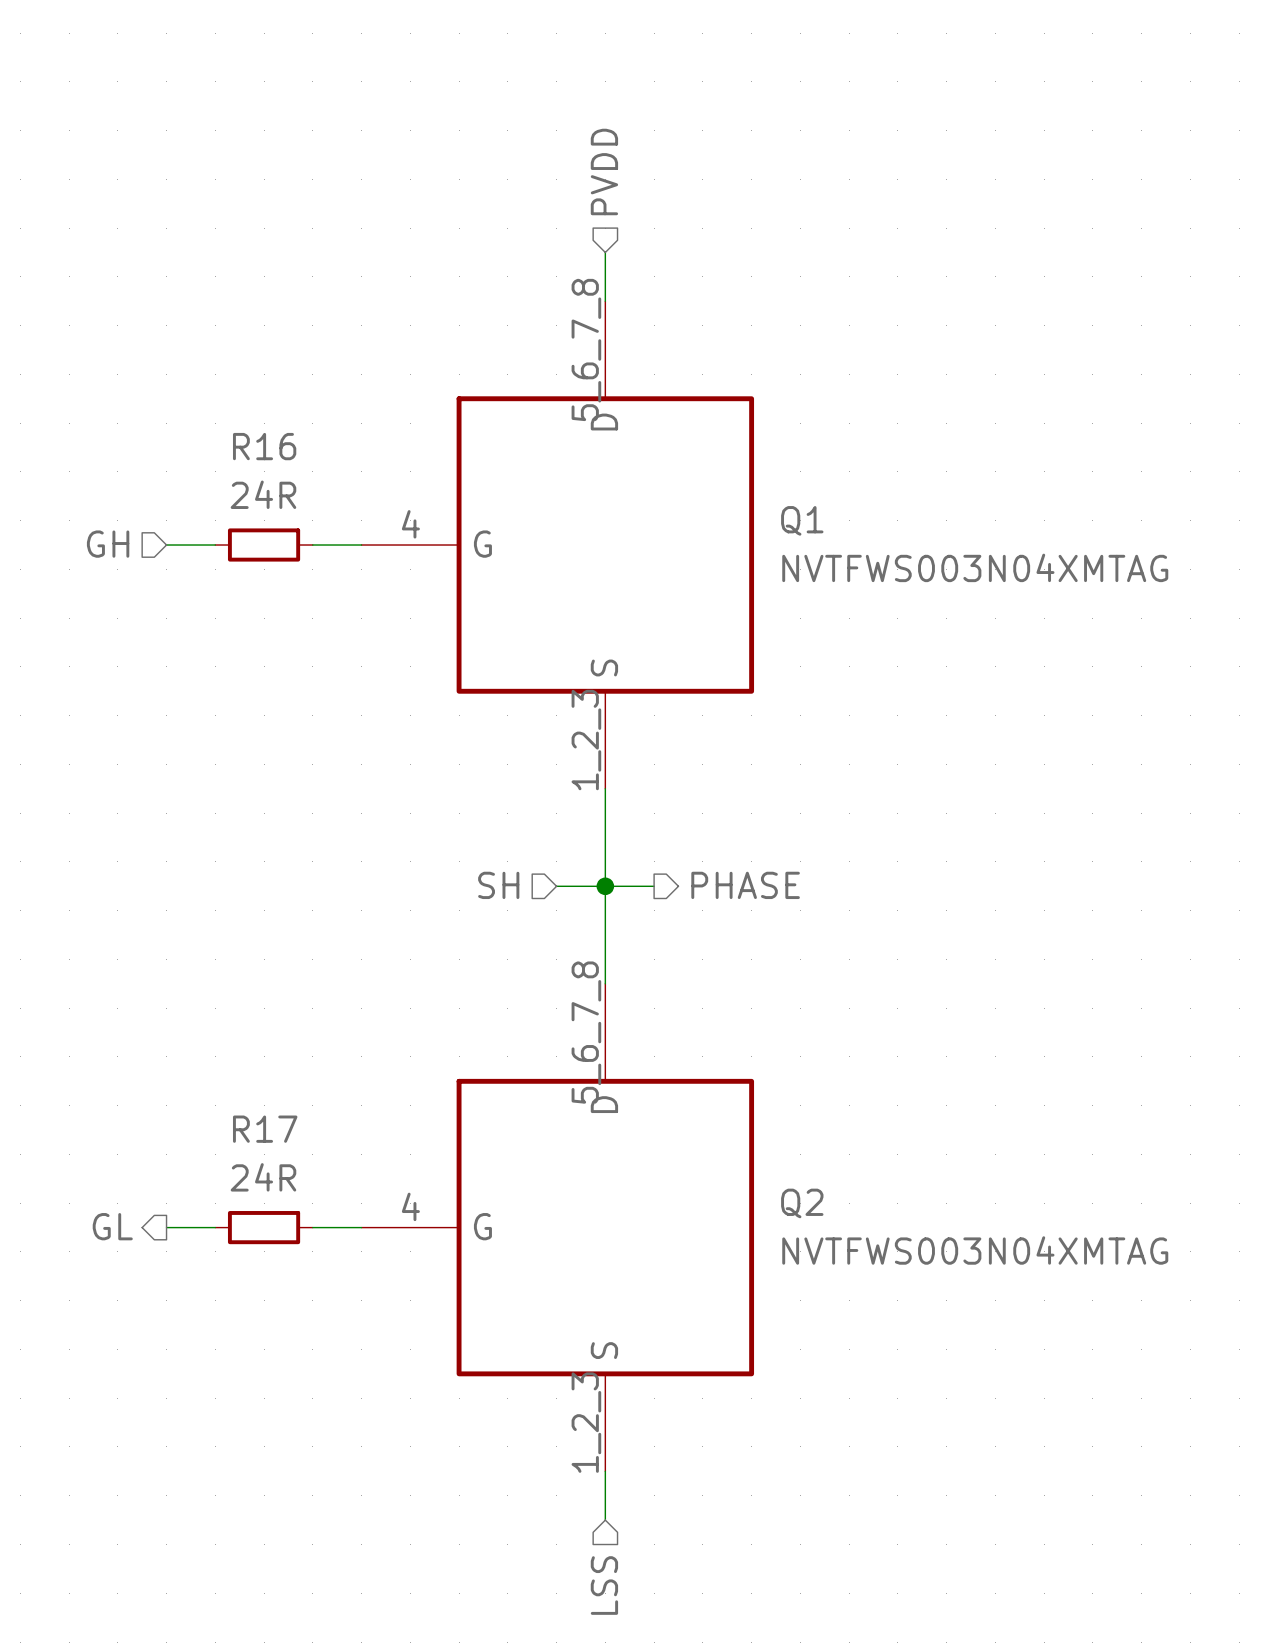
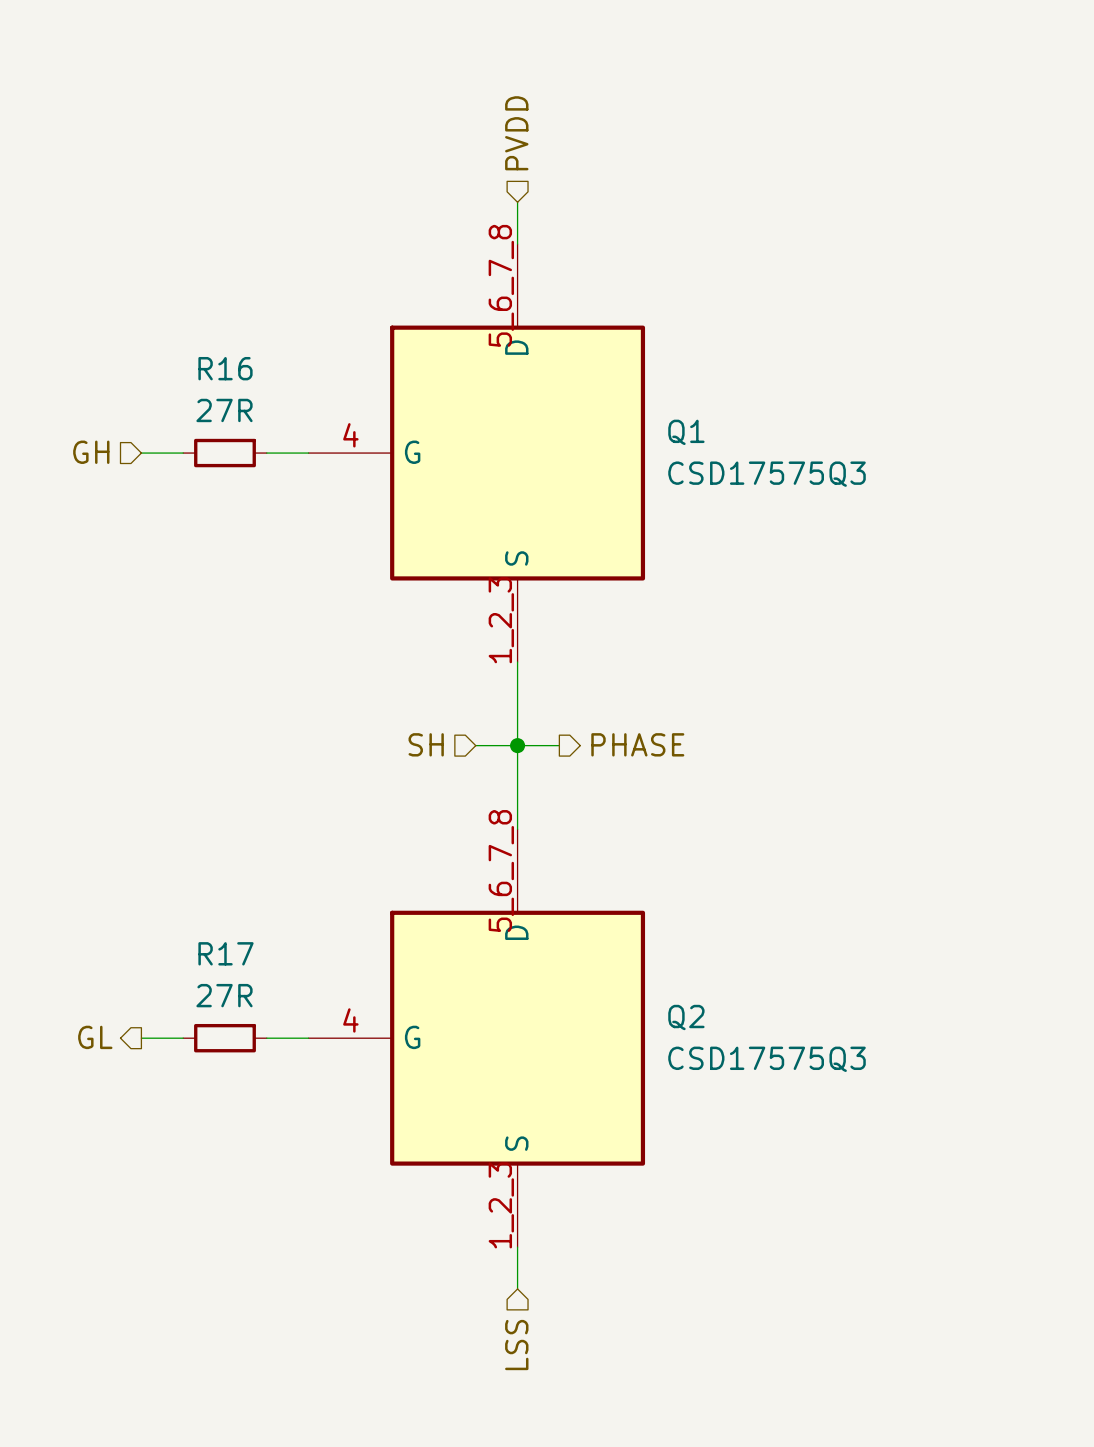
R16 value: 24R (263, 494) -> 27R (224, 410)
Q1 value: NVTFWS003N04XMTAG (975, 567) -> CSD17575Q3 (767, 474)
R17 value: 24R (263, 1177) -> 27R (224, 995)
Q2 value: NVTFWS003N04XMTAG (975, 1250) -> CSD17575Q3 (767, 1059)

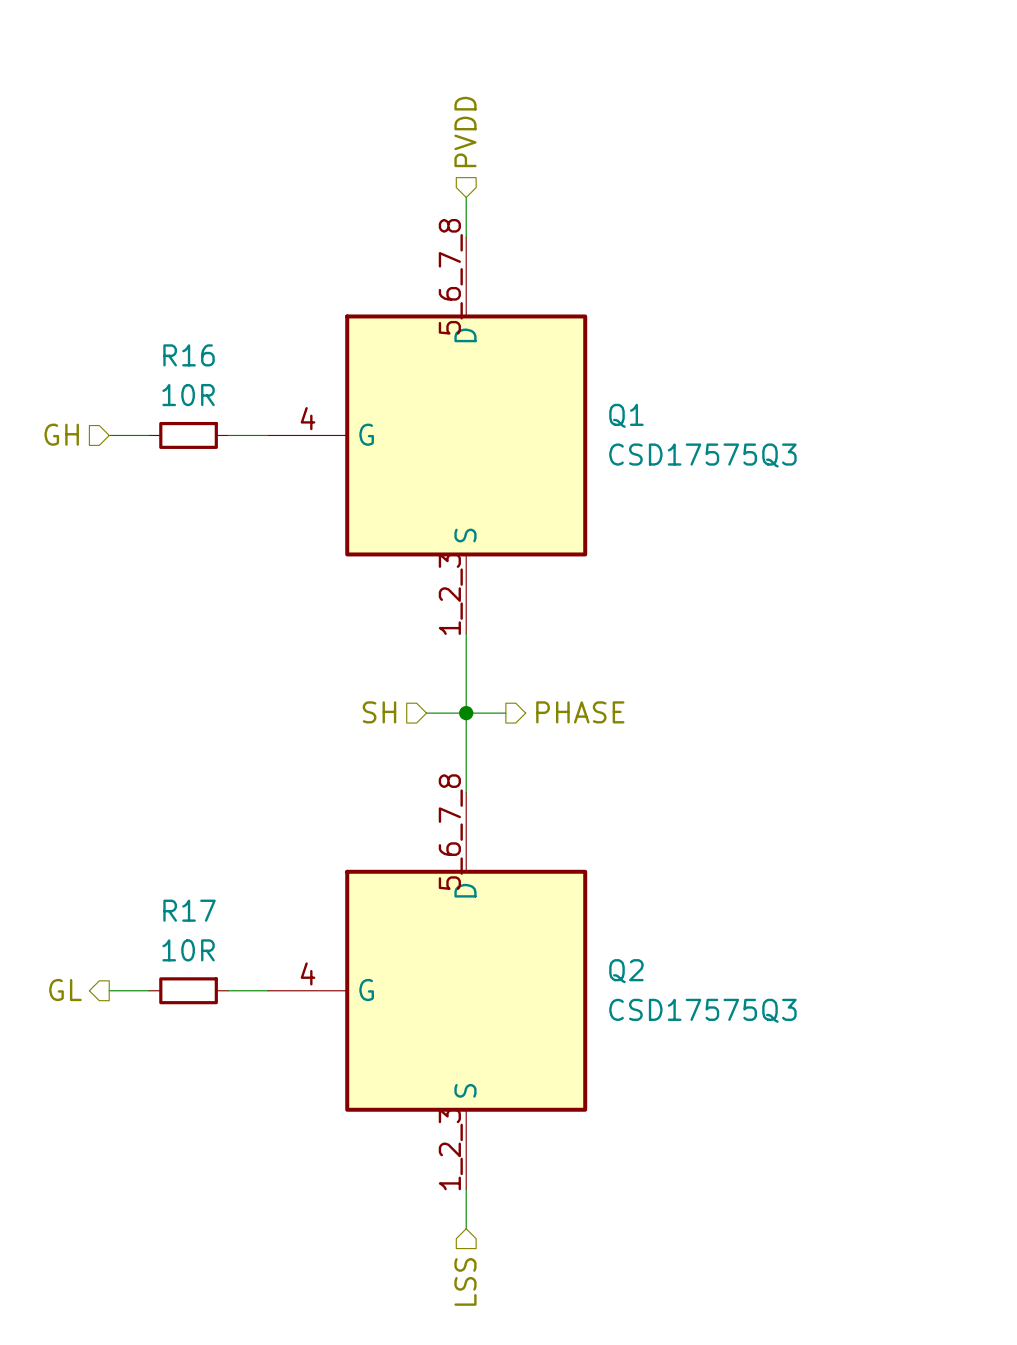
R16 value: 27R (224, 410) -> 10R (188, 395)
R17 value: 27R (224, 995) -> 10R (188, 950)

